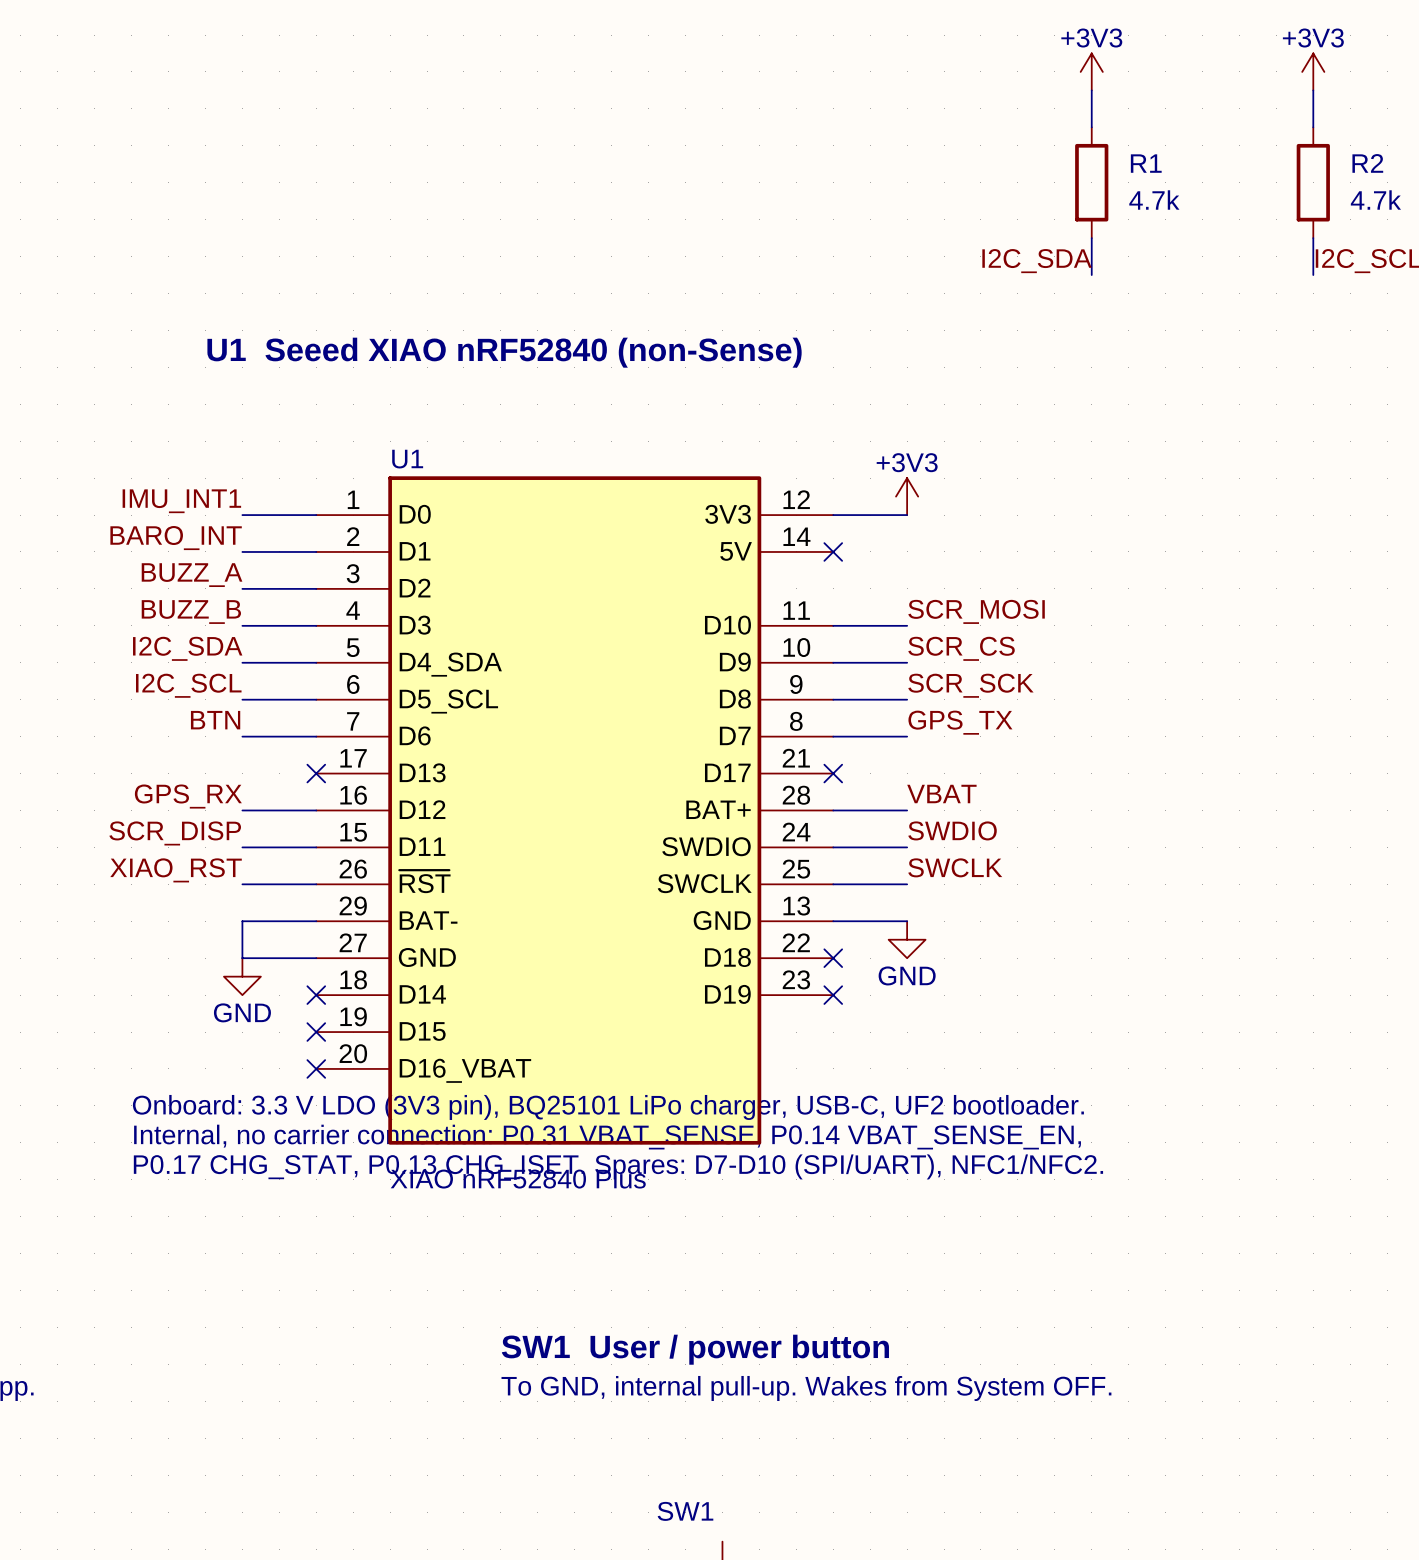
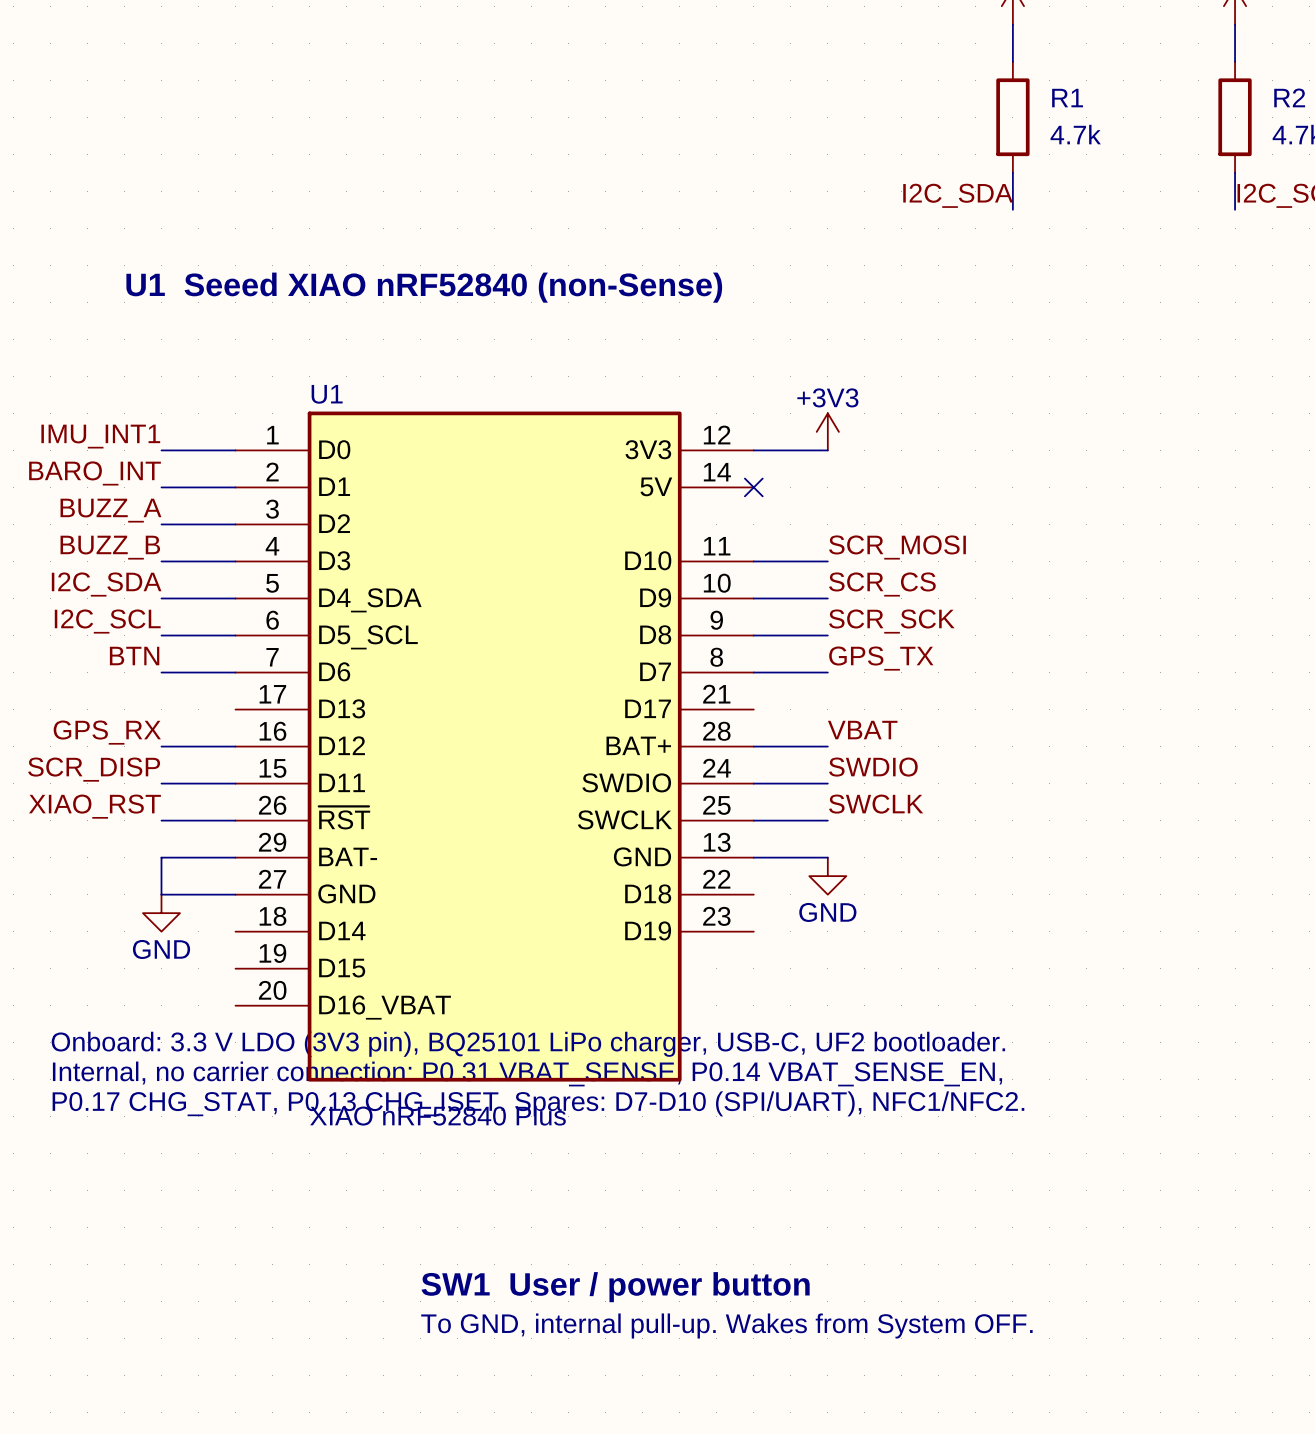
no-connect mark: (316, 773) -> none
no-connect mark: (833, 773) -> none
no-connect mark: (833, 958) -> none
no-connect mark: (316, 995) -> none
no-connect mark: (833, 995) -> none
no-connect mark: (316, 1032) -> none
no-connect mark: (316, 1068) -> none

